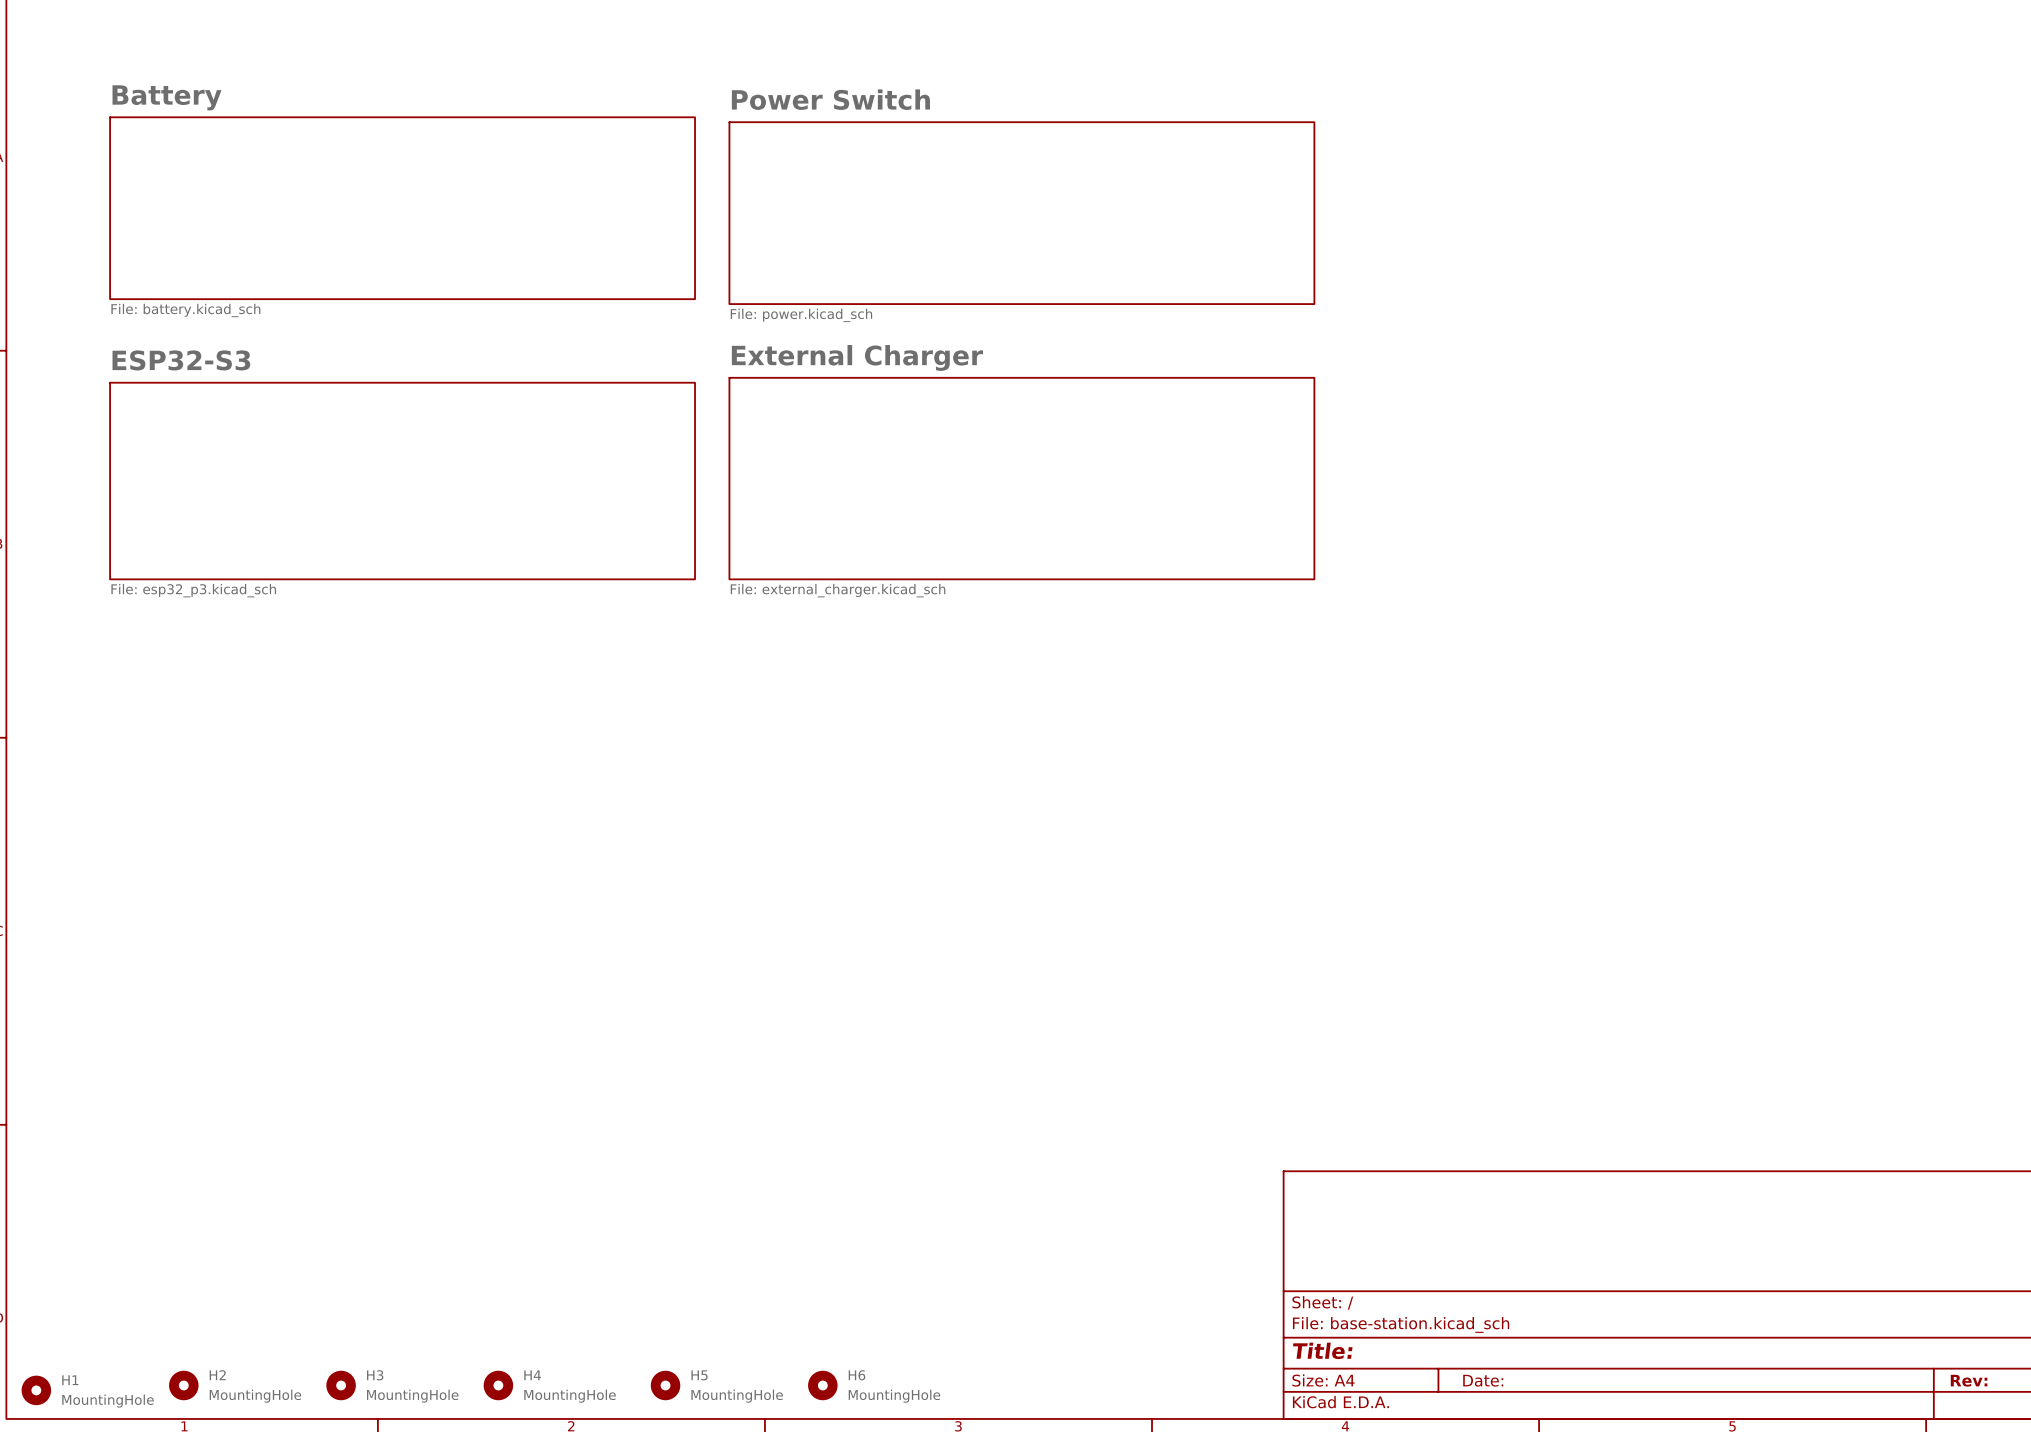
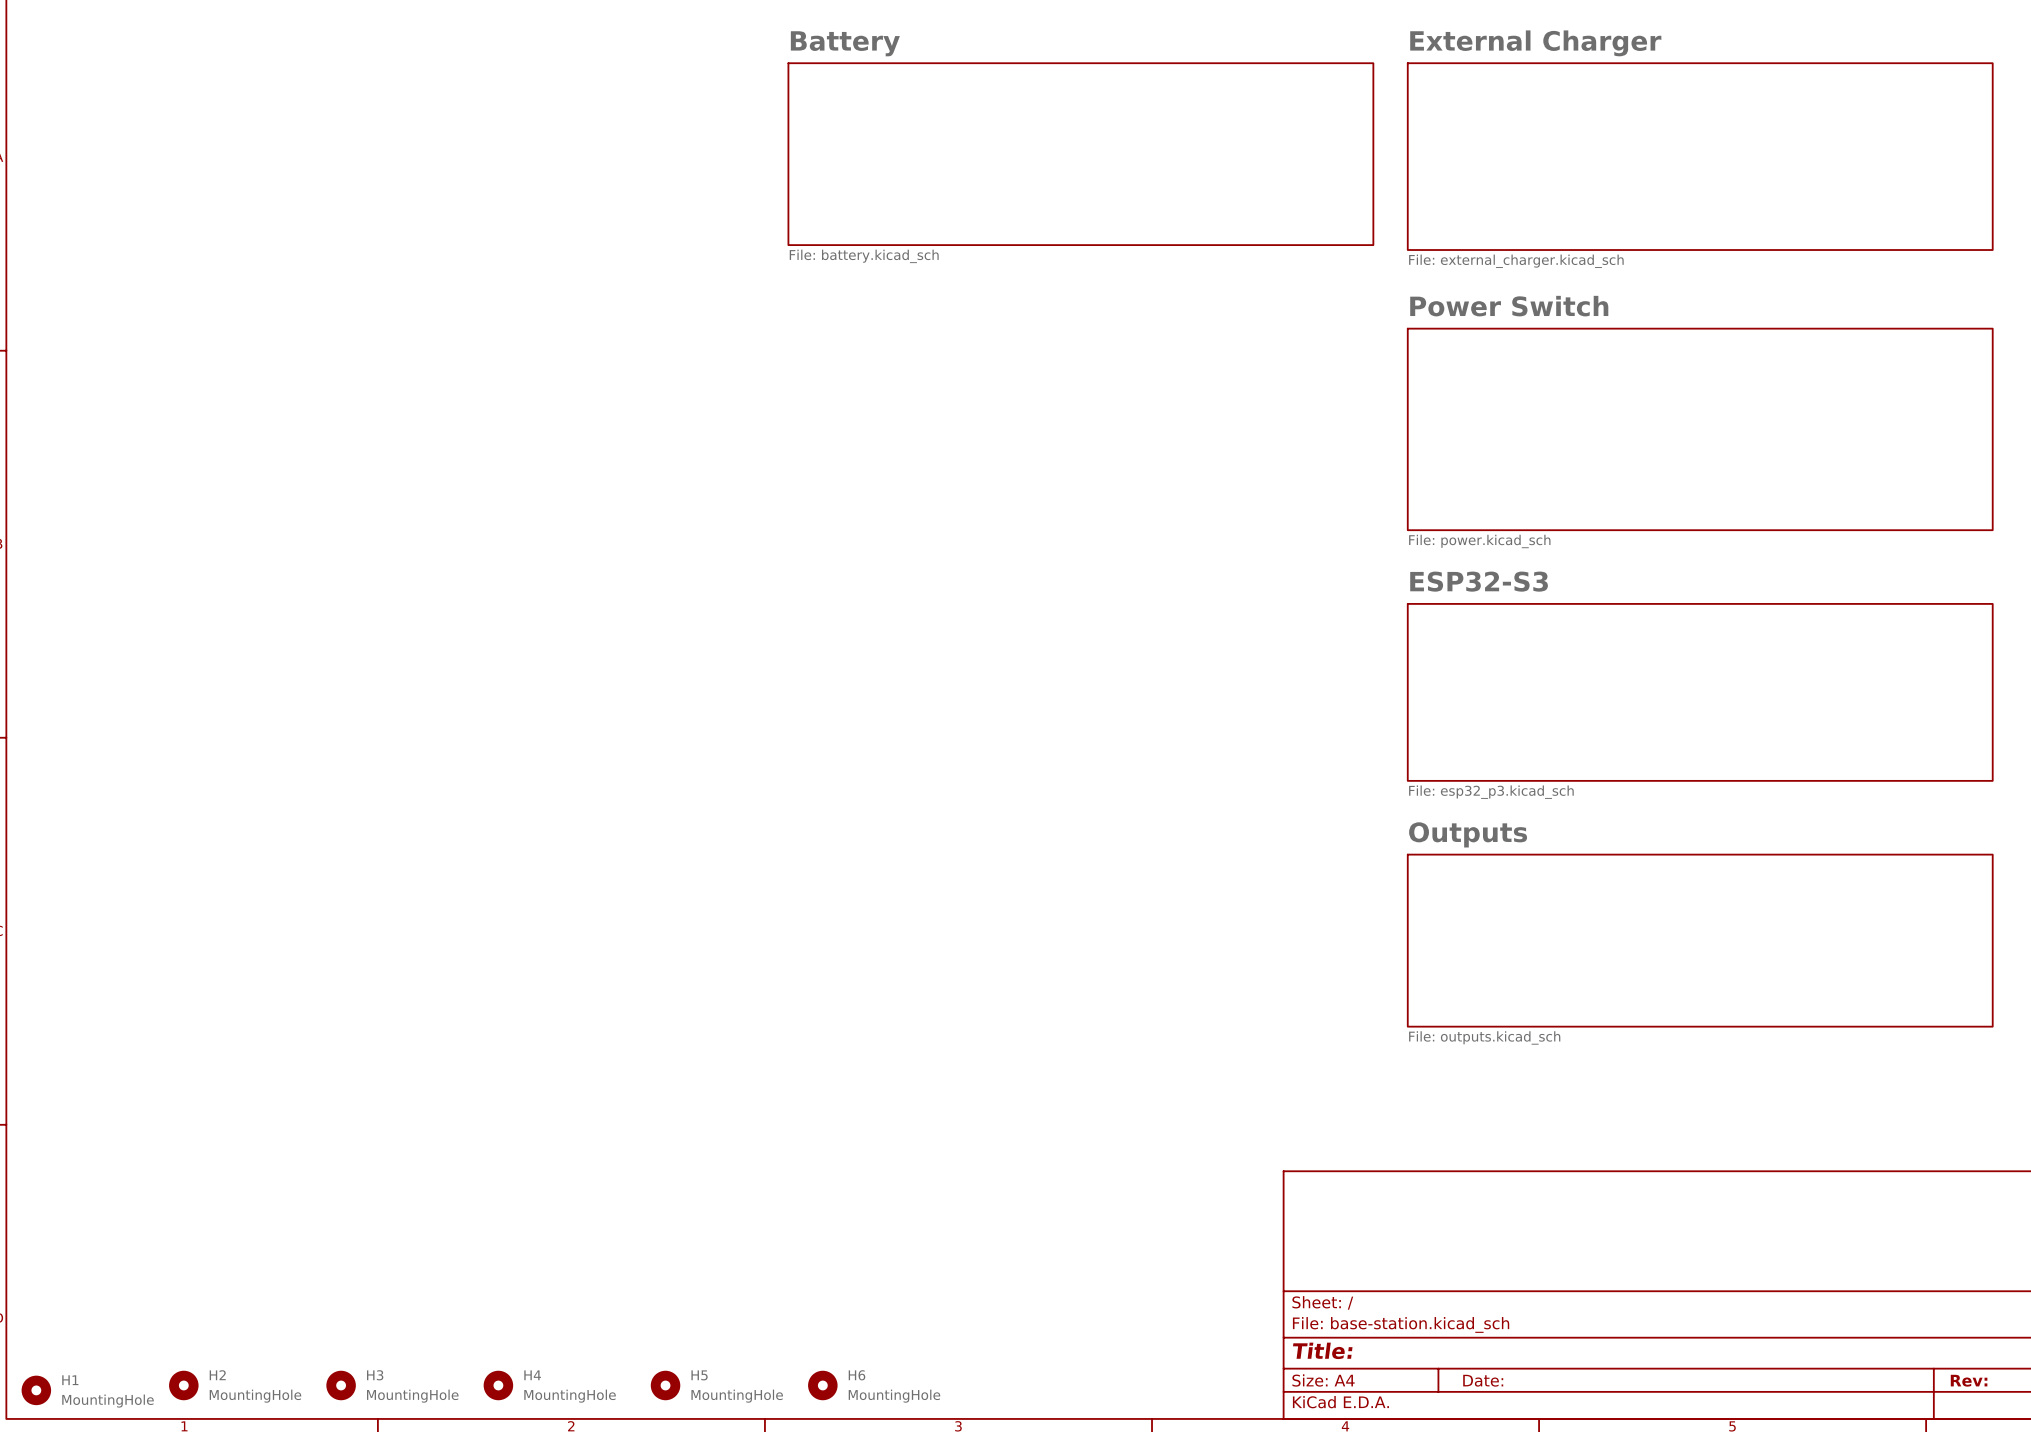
sheet Battery: none -> File: battery.kicad_sch (1080, 154)
sheet External Charger: none -> File: external_charger.kicad_sch (1700, 156)
sheet Battery: File: battery.kicad_sch (402, 208) -> none
sheet Power Switch: File: power.kicad_sch (1021, 213) -> none
sheet ESP32-S3 shape: [109, 382, 696, 580] -> [1407, 603, 1994, 782]
sheet Power Switch: none -> File: power.kicad_sch (1700, 429)
sheet External Charger: File: external_charger.kicad_sch (1021, 478) -> none
sheet Outputs: none -> File: outputs.kicad_sch (1700, 940)

